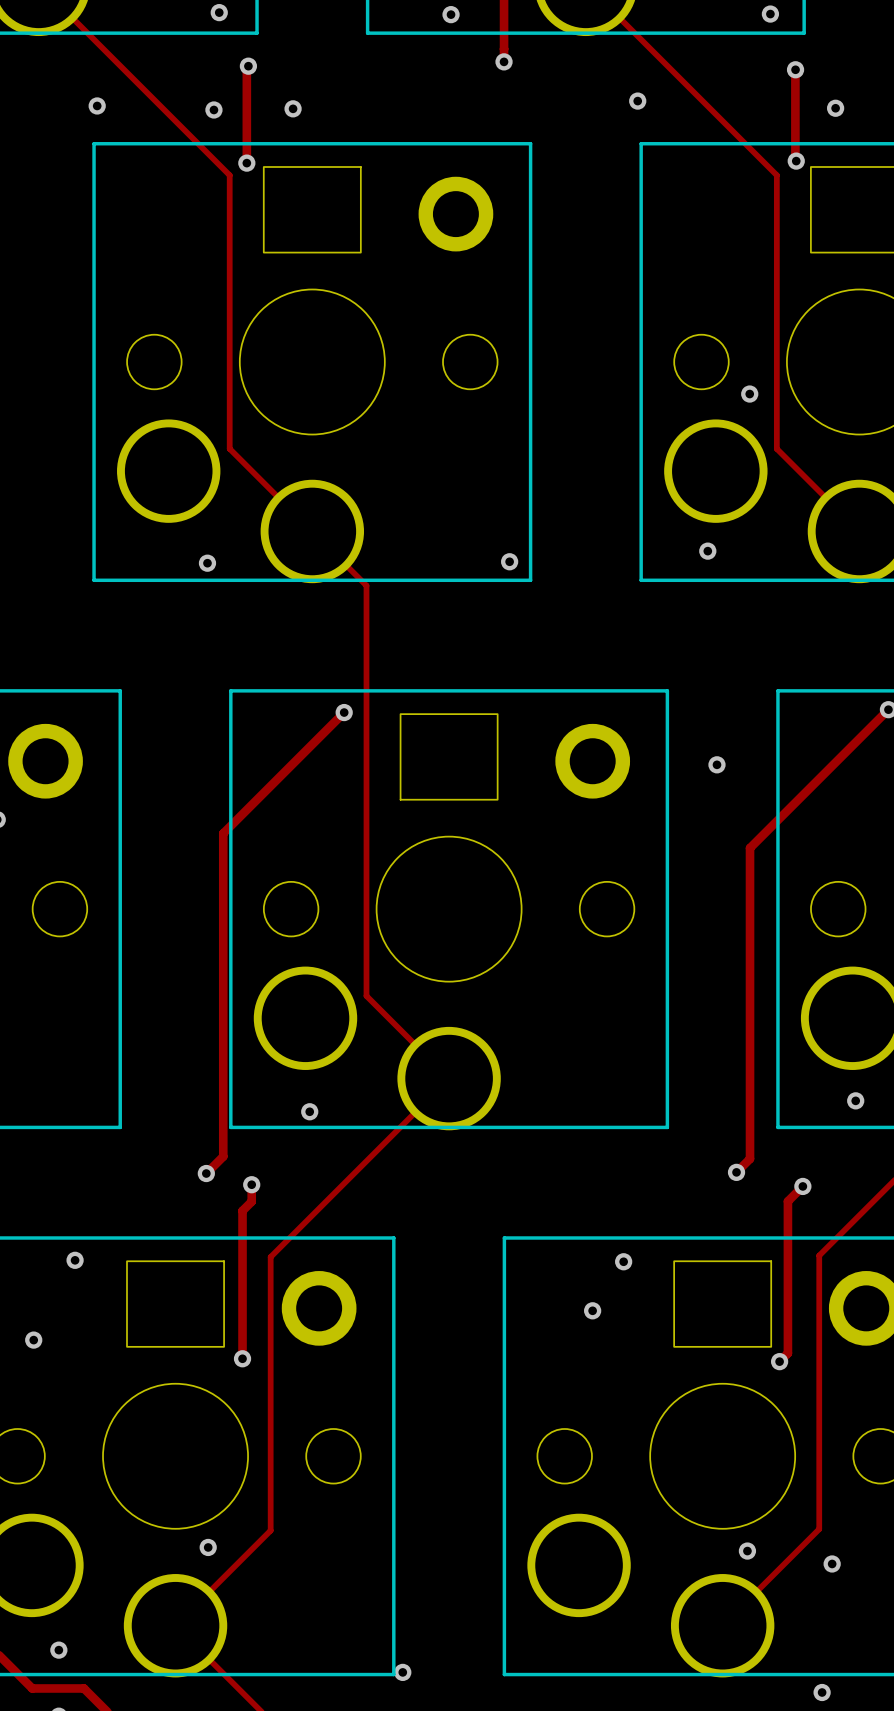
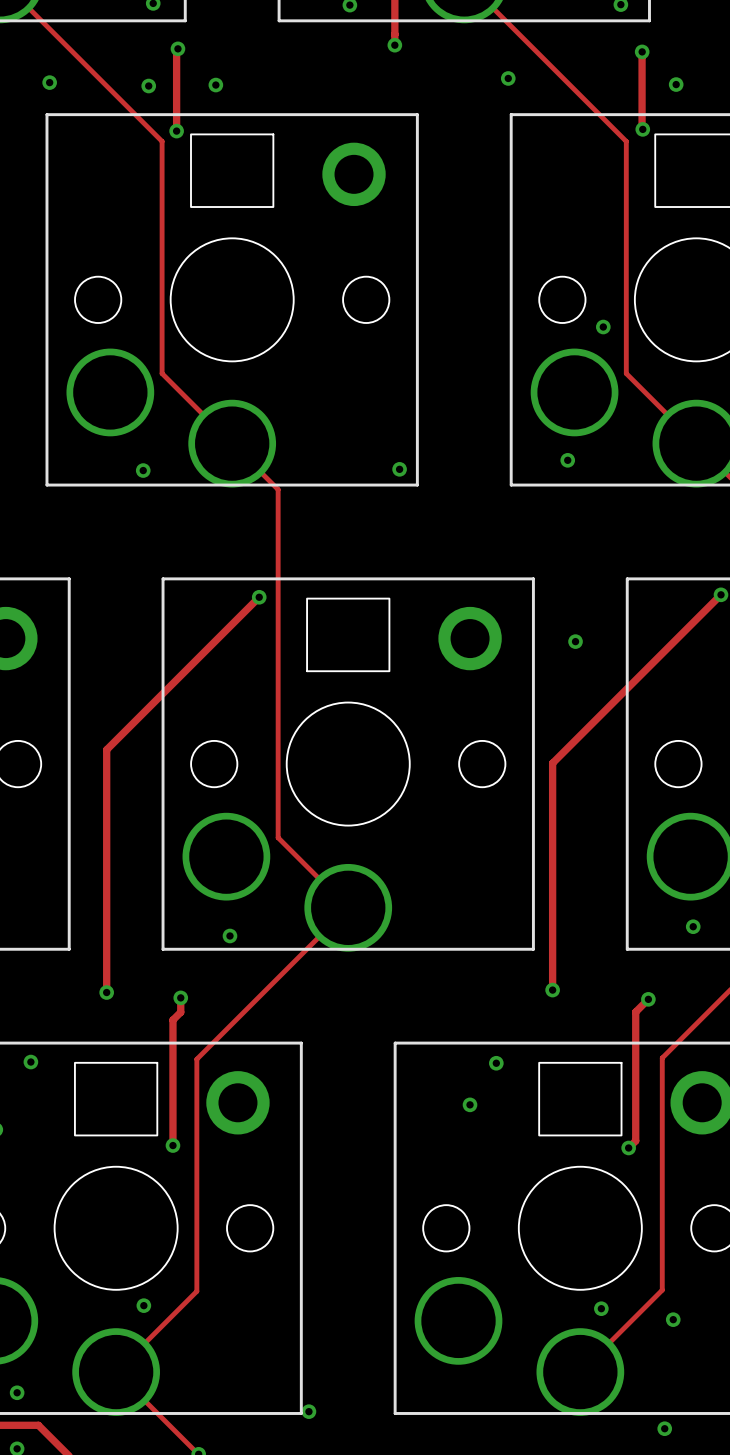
track: (223, 833) (223, 1156) (206, 1173) -> (156, 699) (106, 749) (106, 992)
track: (750, 848) (750, 1158) (736, 1172) -> (603, 712) (552, 763) (552, 990)
via position: (736, 1172) -> (552, 990)
via position: (206, 1173) -> (106, 992)

